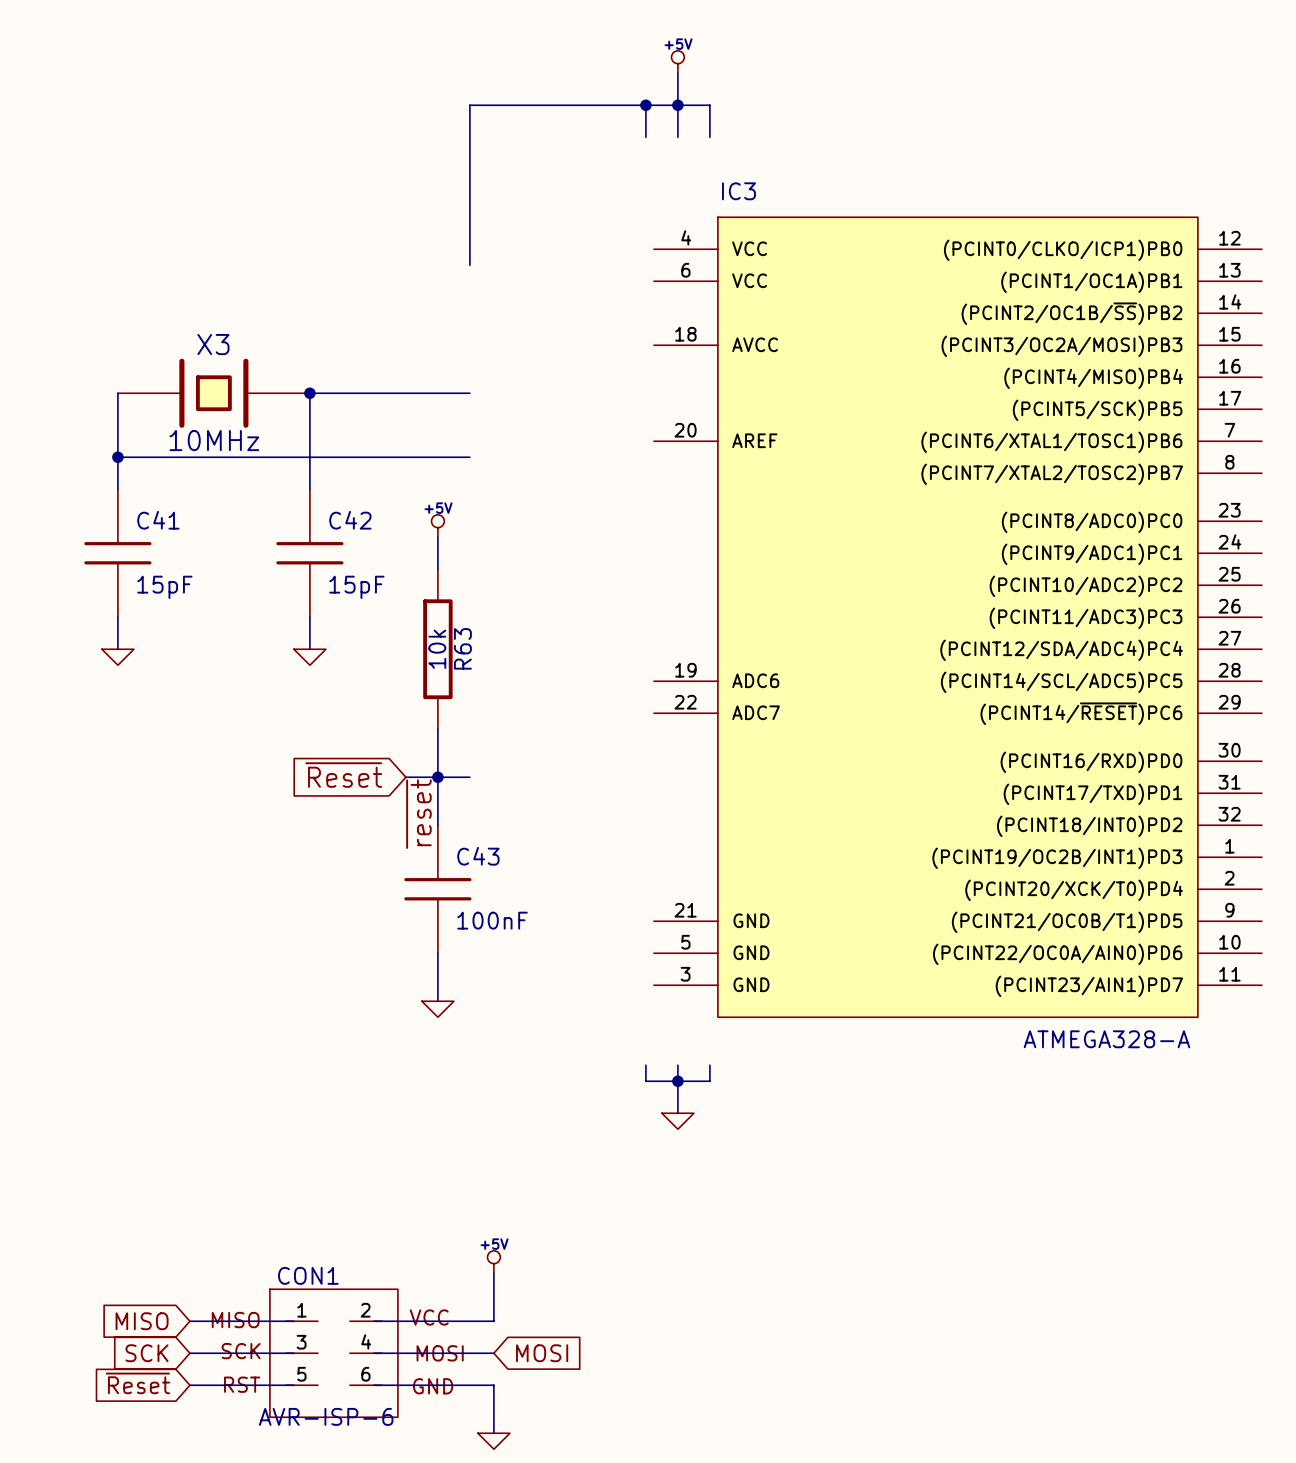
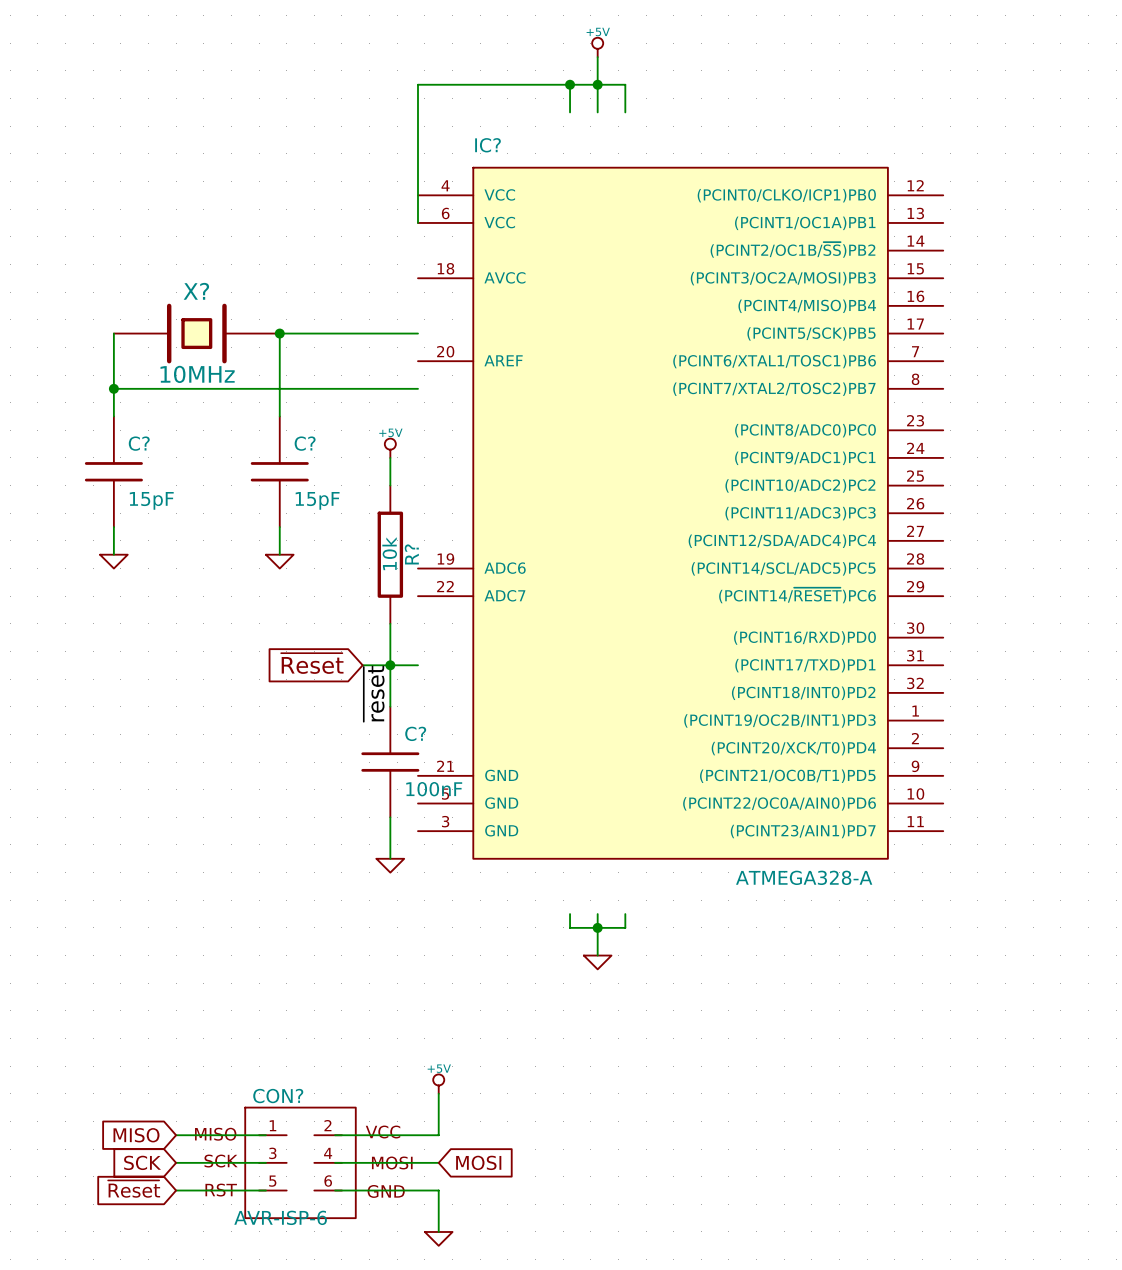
X3 name: X3 (213, 344) -> X? (196, 291)
C41 name: C41 (158, 520) -> C? (139, 443)
C42 name: C42 (350, 520) -> C? (305, 443)
IC?: none -> ATMEGA328-A (680, 513)
IC3: ATMEGA328-A (957, 617) -> none
R63 name: R63 (462, 648) -> R? (411, 554)
C43 name: C43 (478, 856) -> C? (415, 733)
CON1 name: CON1 (308, 1275) -> CON? (278, 1096)

